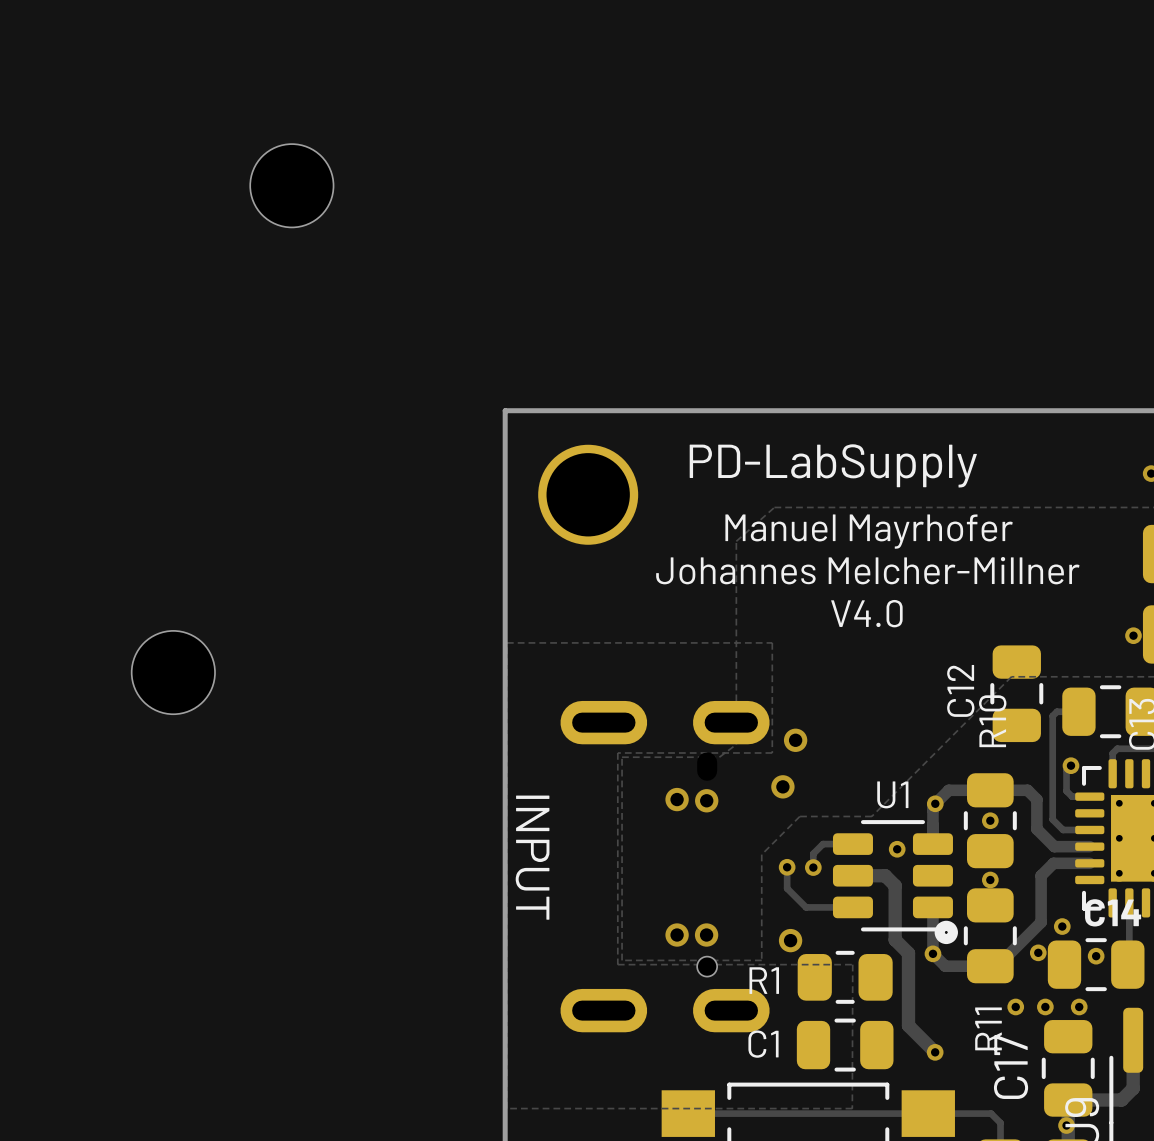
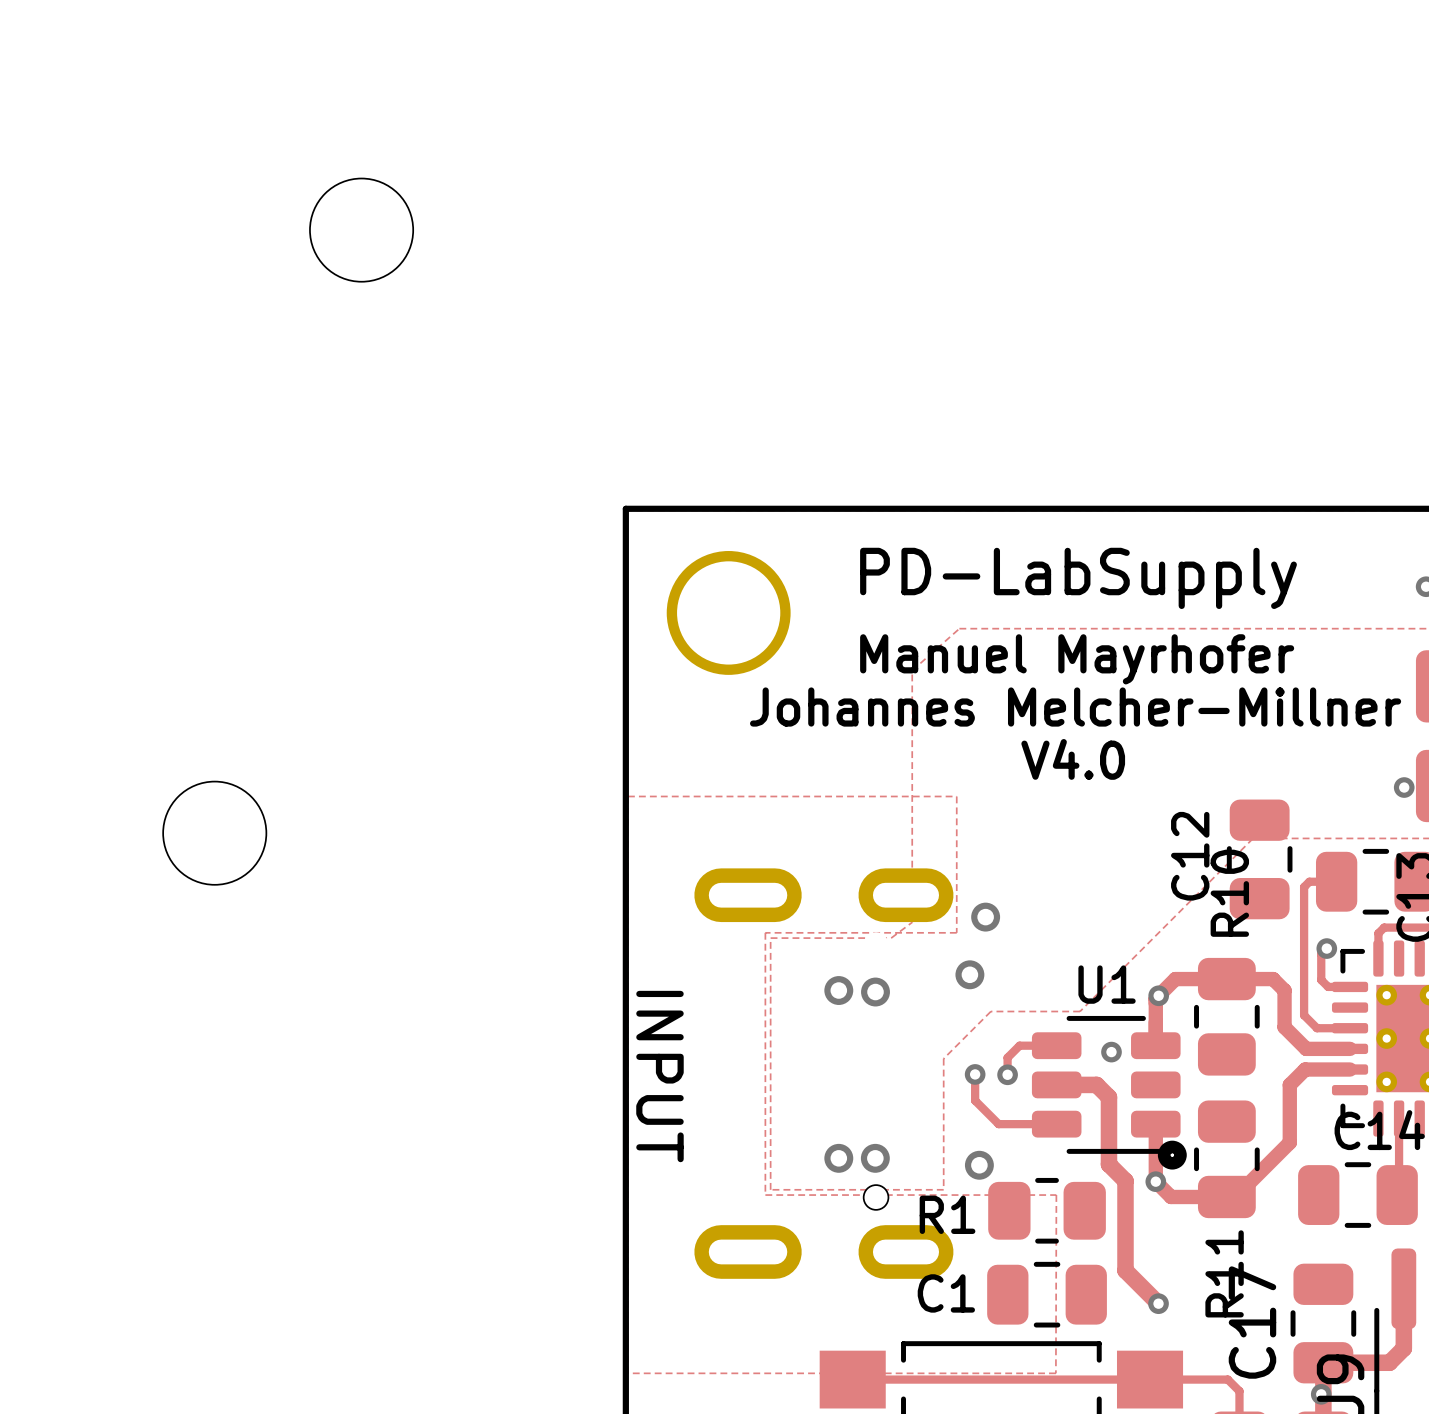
via: (990, 820) -> none
via: (990, 879) -> none
via: (1062, 926) -> none
via: (1038, 952) -> none
via: (1096, 956) -> none
via: (1015, 1006) -> none
via: (1045, 1006) -> none
via: (1079, 1006) -> none

